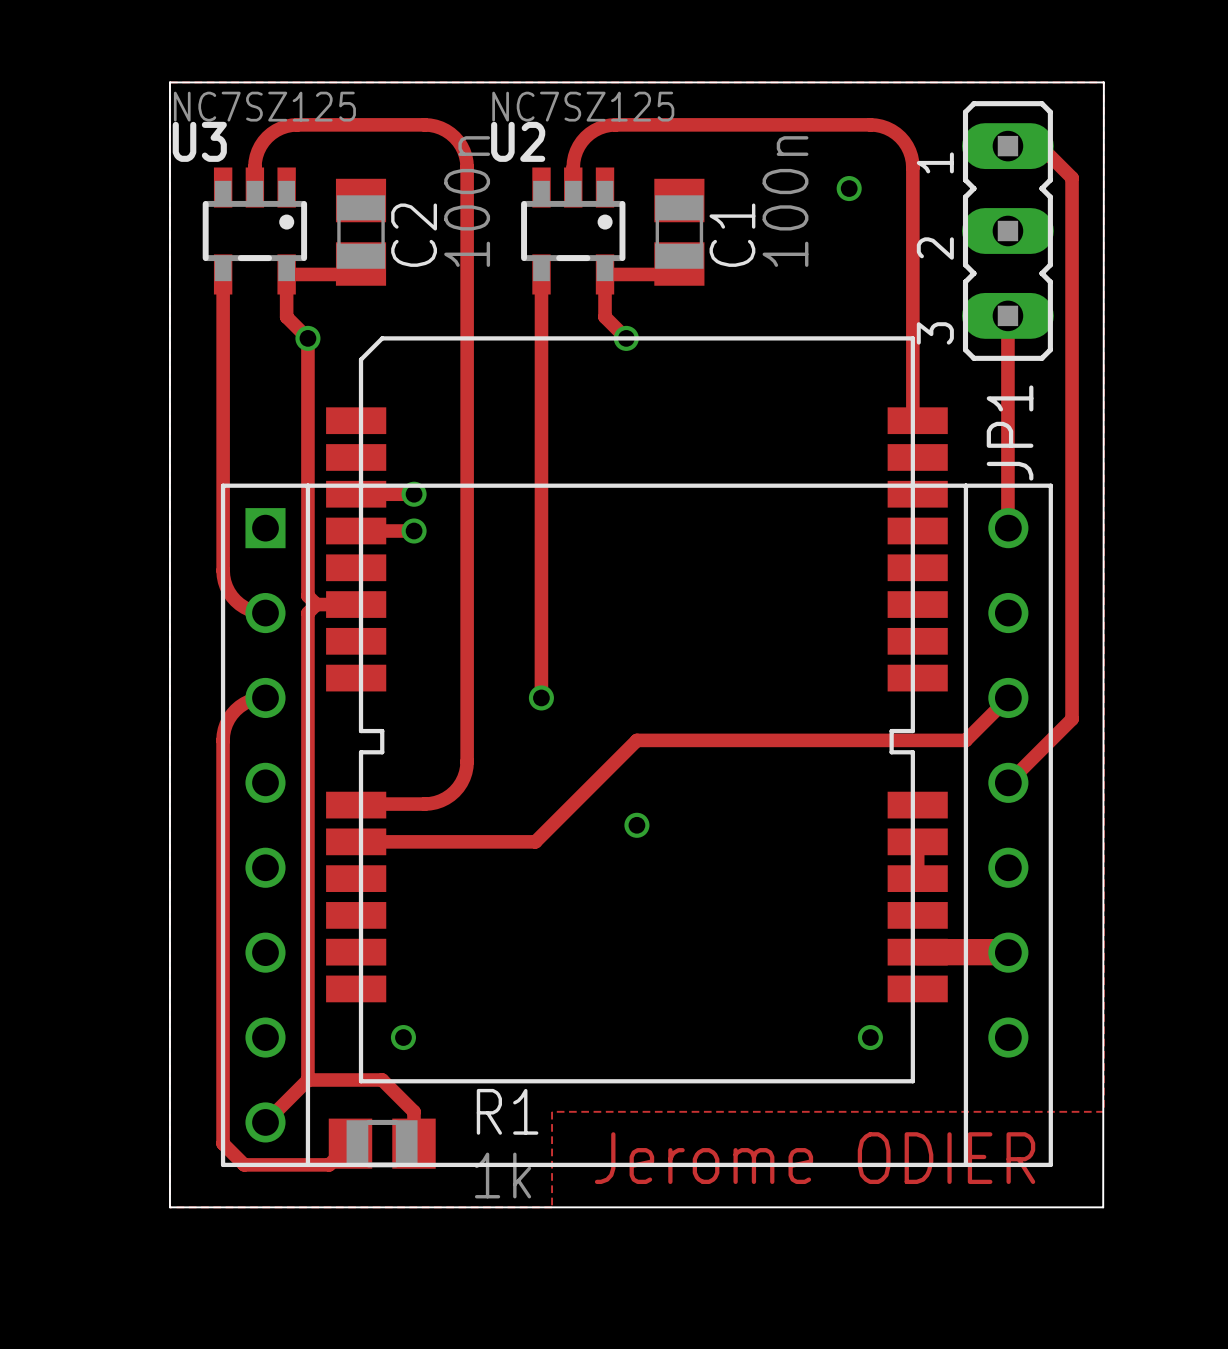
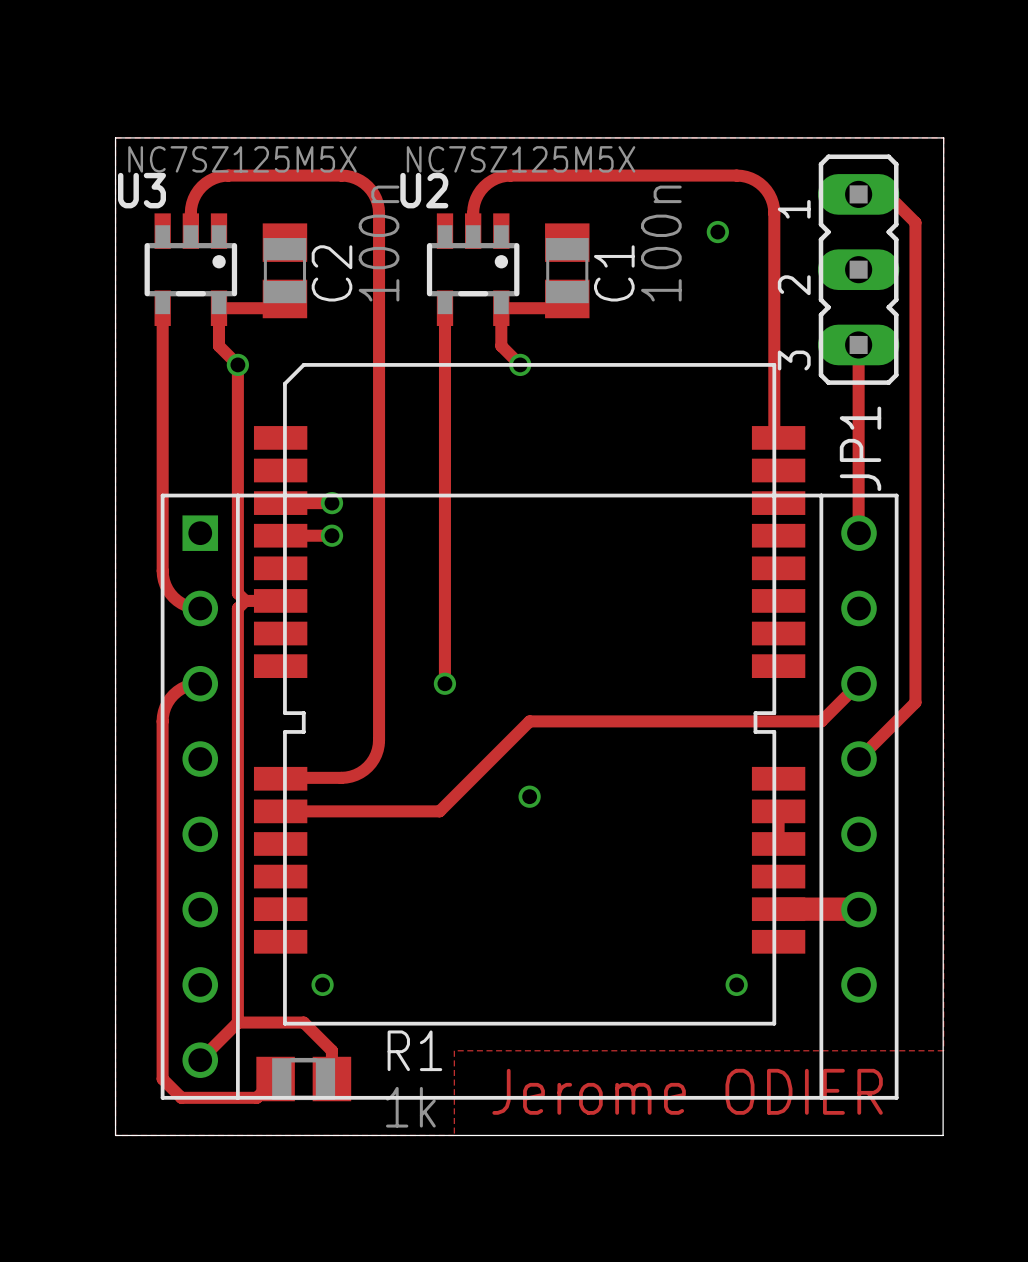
U3 value: NC7SZ125 (264, 106) -> NC7SZ125M5X (242, 159)
U2 value: NC7SZ125 (583, 106) -> NC7SZ125M5X (521, 159)

